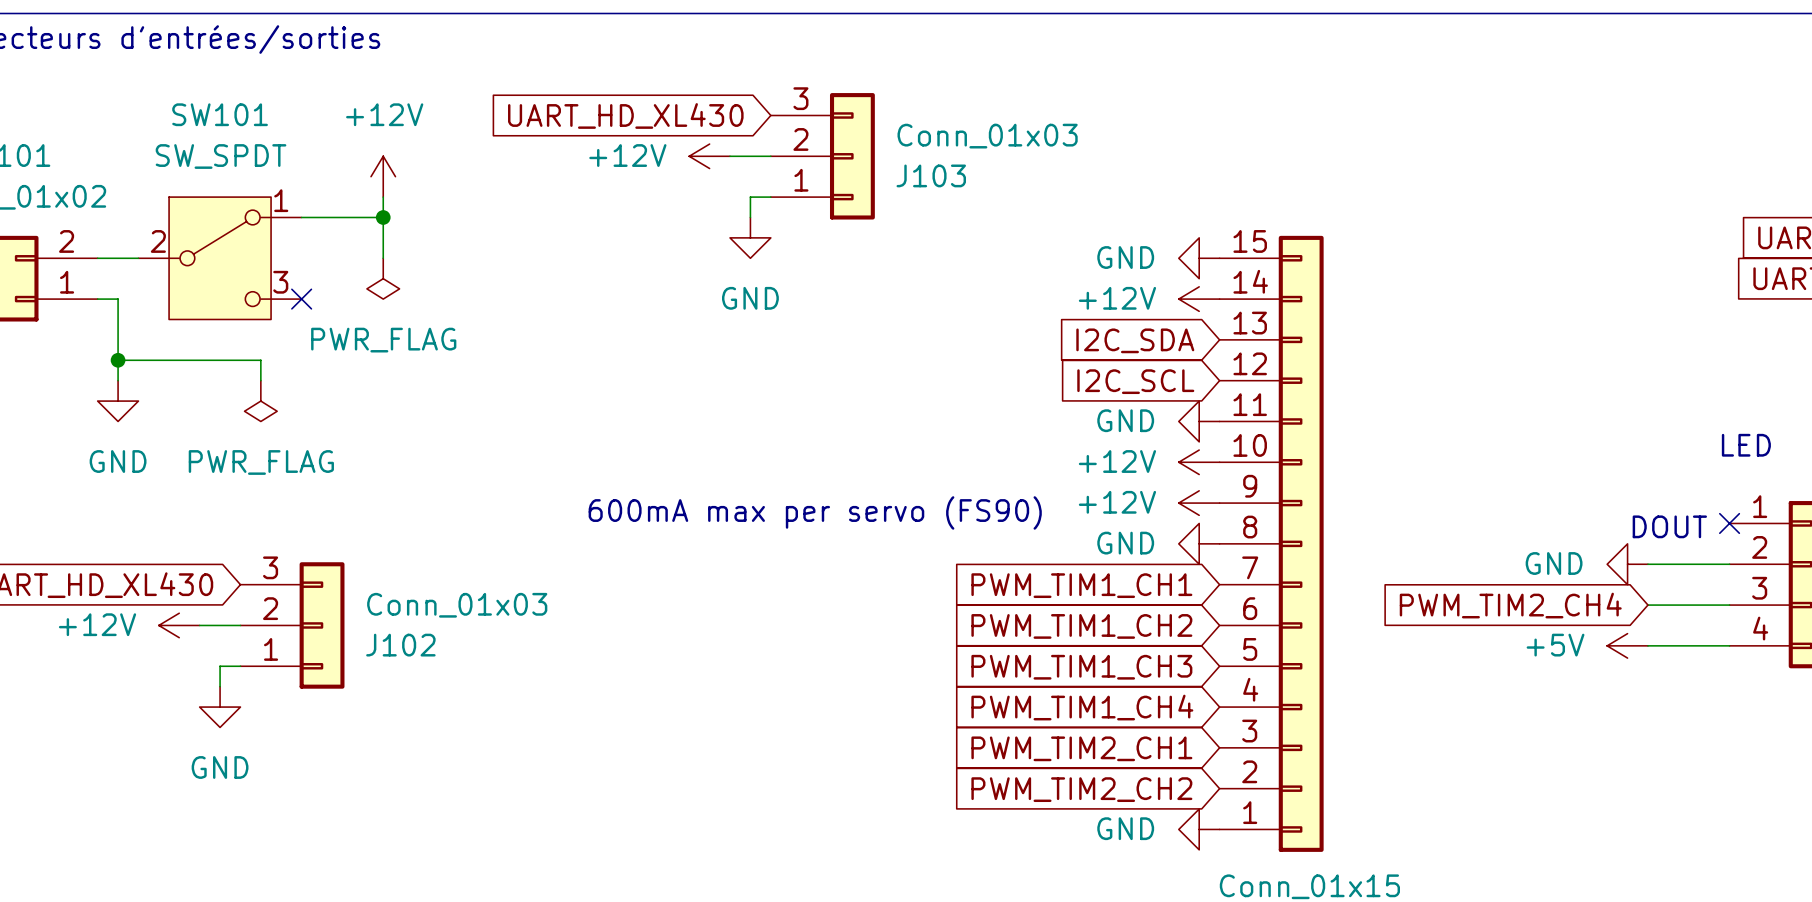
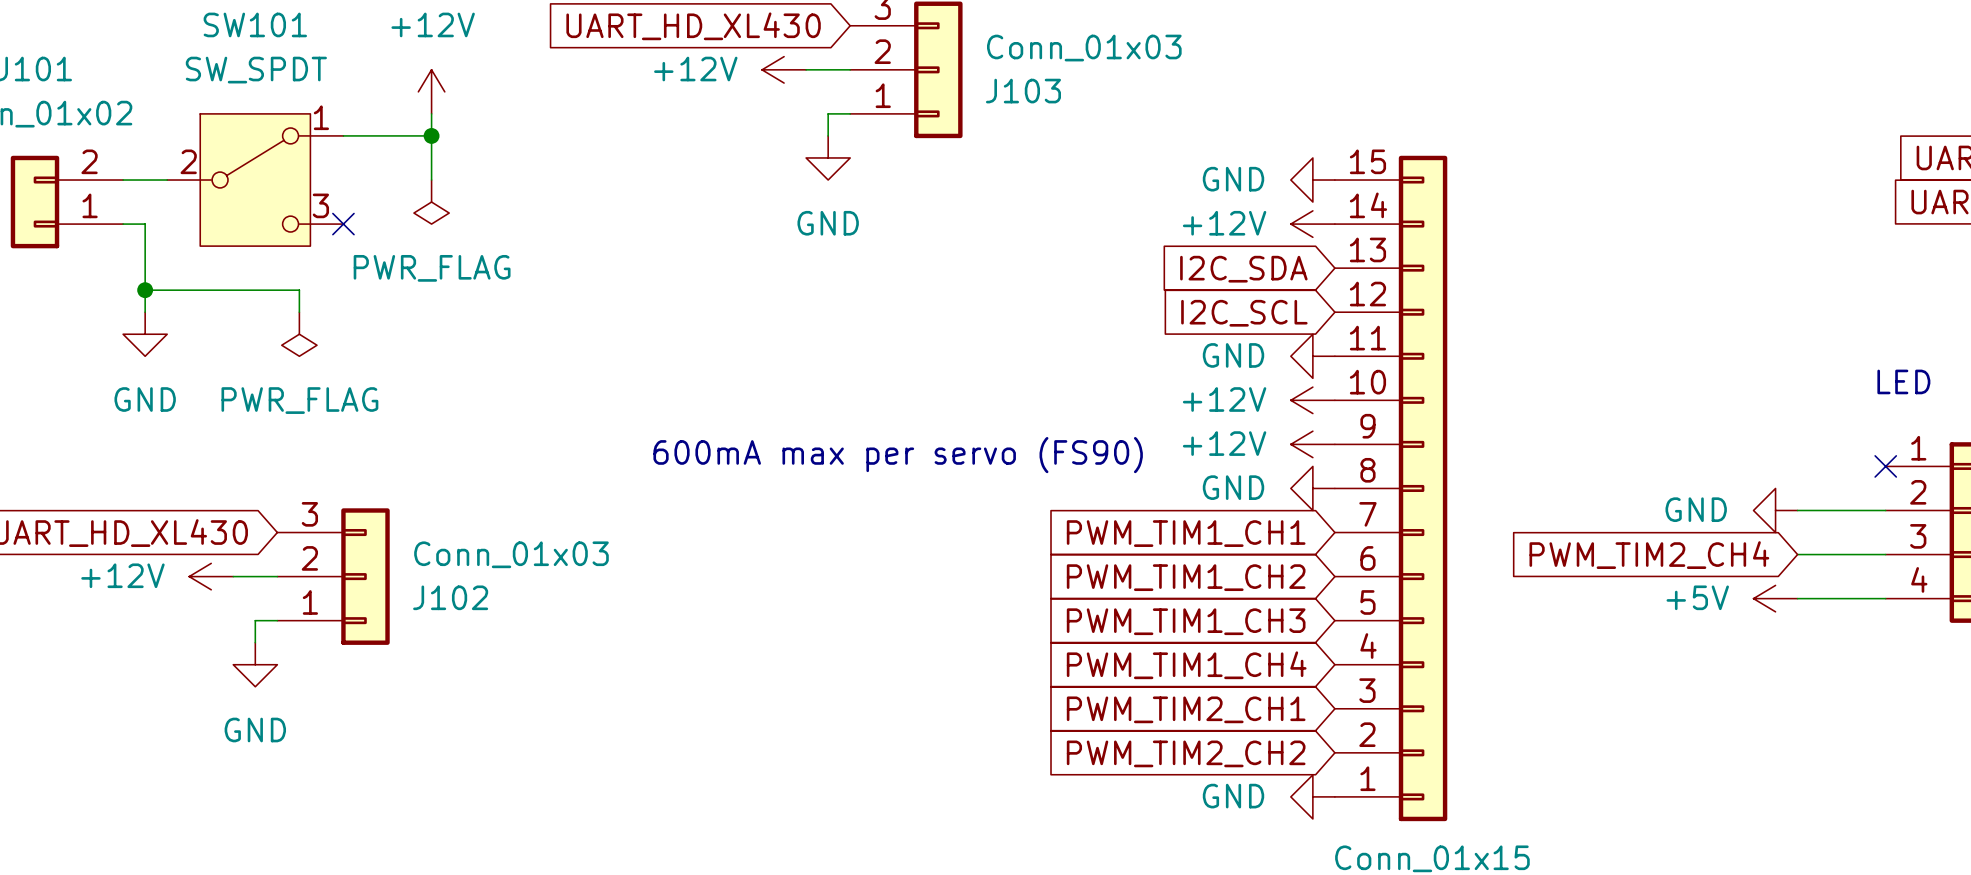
text: DOUT (1669, 526) -> none

